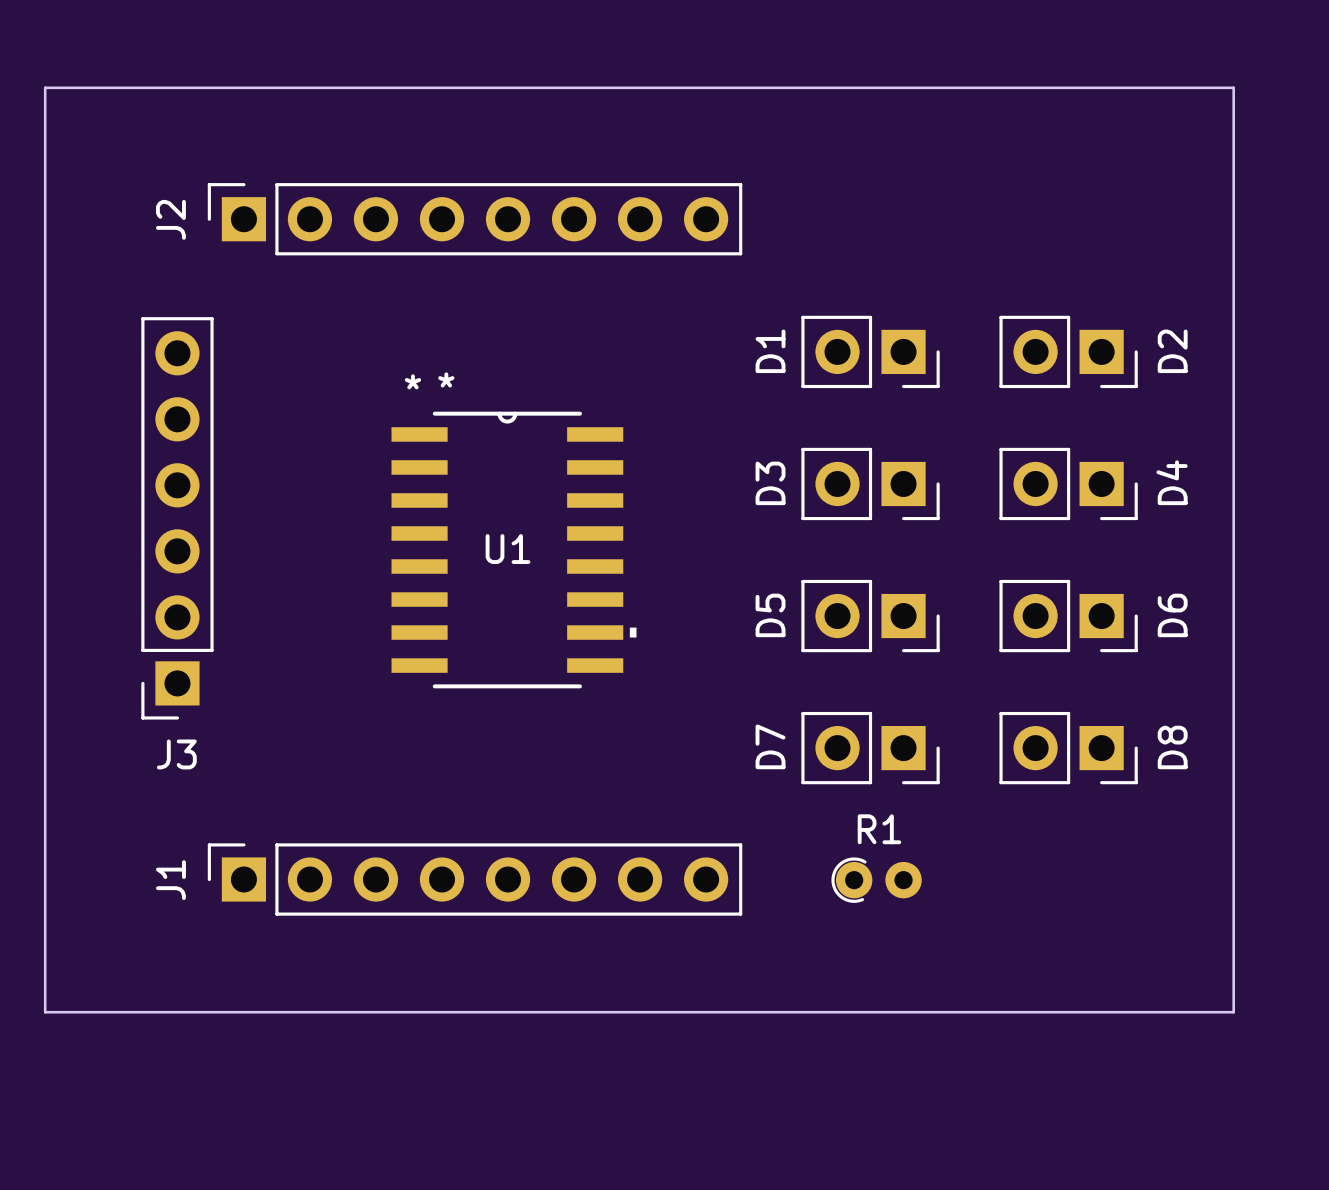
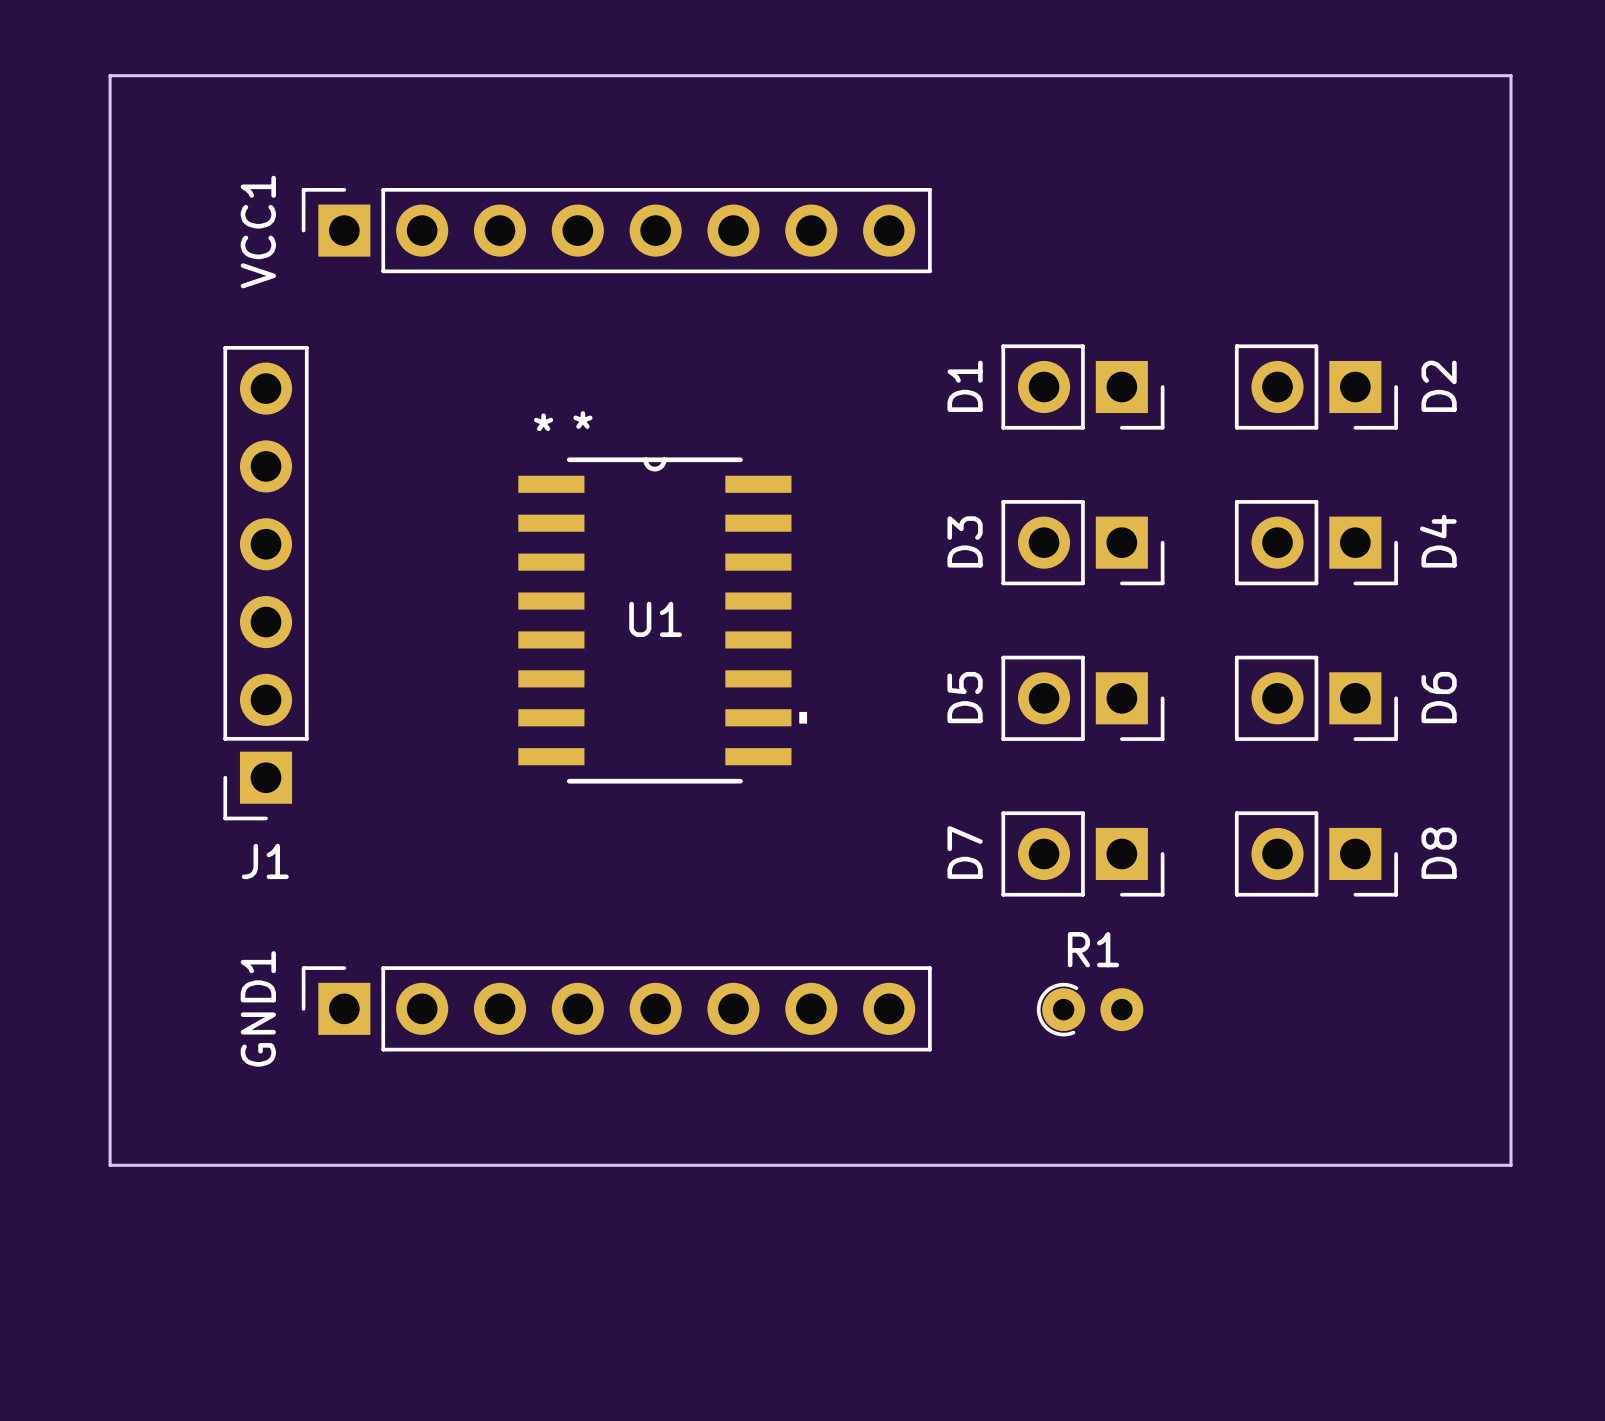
J2 name: J2 (170, 219) -> VCC1 (258, 232)
J3 name: J3 (176, 754) -> J1 (265, 861)
J1 name: J1 (170, 880) -> GND1 (258, 1008)

